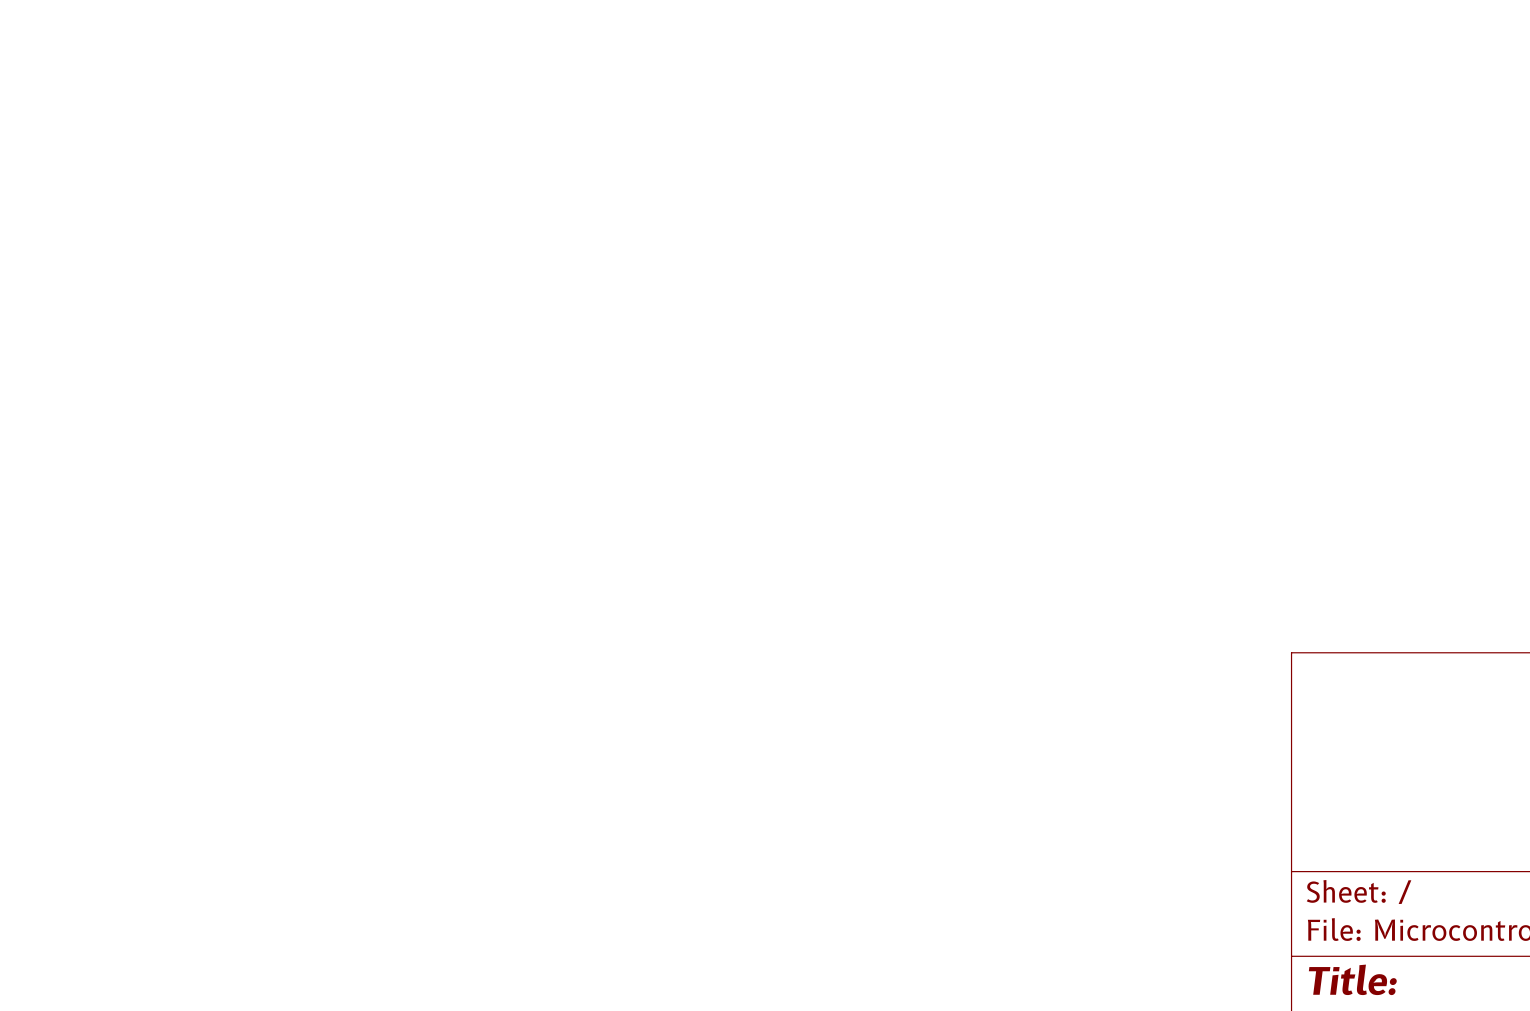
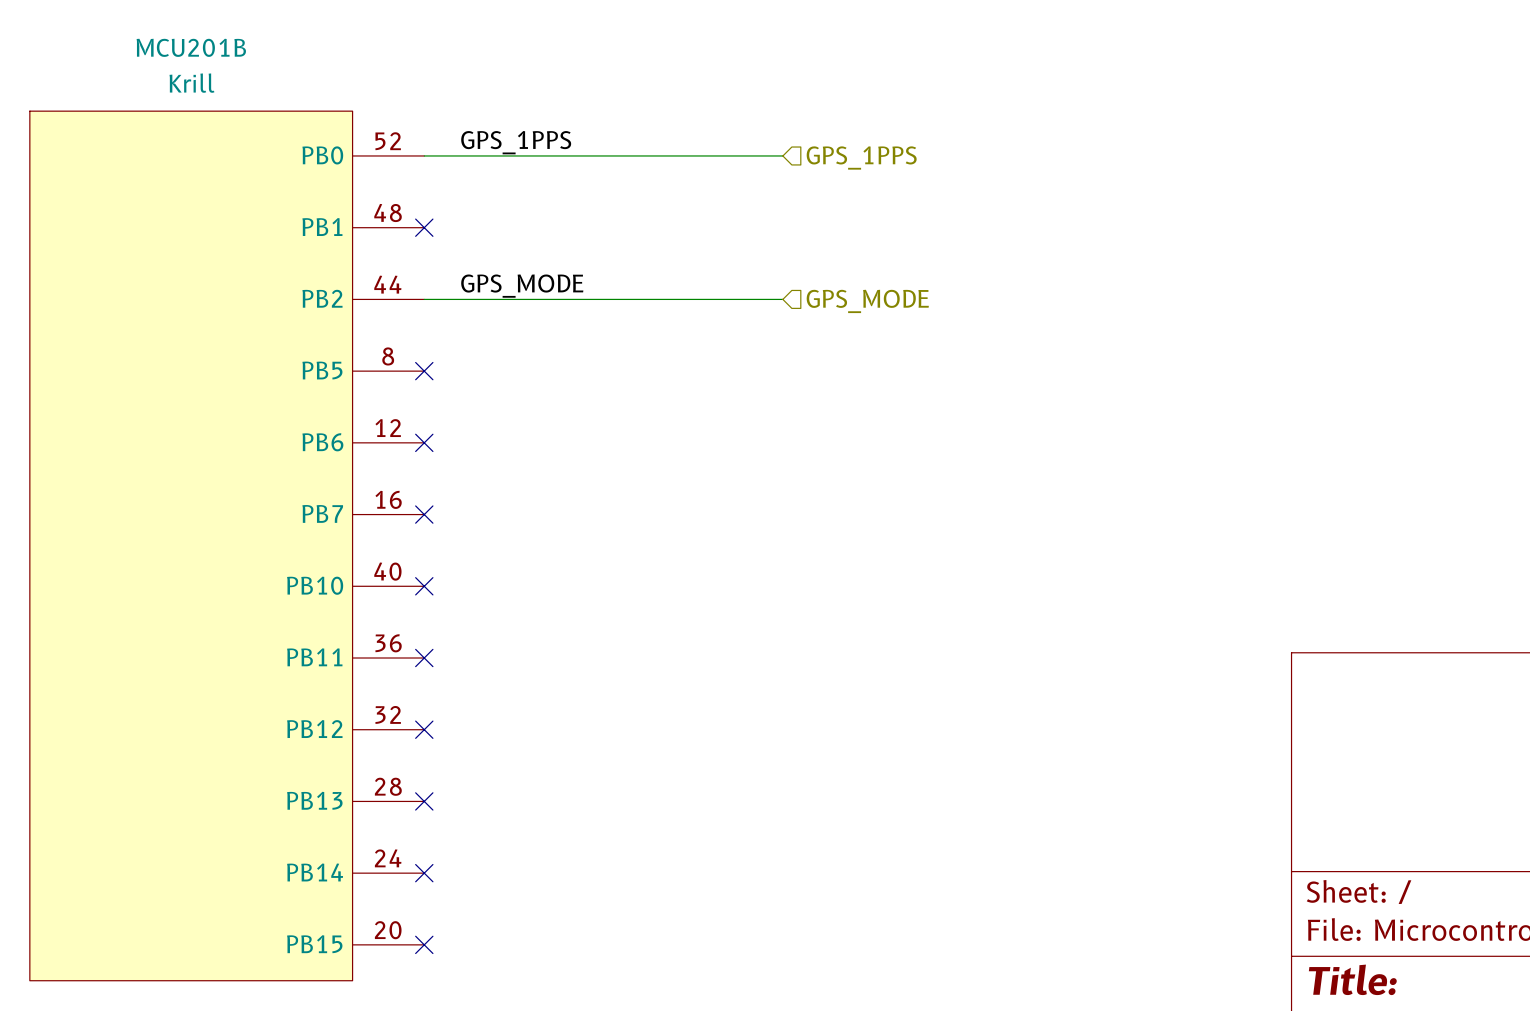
label: none -> GPS_1PPS (516, 142)
wire: none -> (424, 155) (782, 155)
hierarchical label: none -> GPS_1PPS (861, 157)
no-connect mark: none -> (424, 227)
label: none -> GPS_MODE (522, 286)
wire: none -> (424, 299) (782, 299)
hierarchical label: none -> GPS_MODE (867, 301)
no-connect mark: none -> (424, 371)
no-connect mark: none -> (424, 442)
no-connect mark: none -> (424, 514)
MCU201B: none -> Krill (227, 545)
no-connect mark: none -> (424, 586)
no-connect mark: none -> (424, 658)
no-connect mark: none -> (424, 729)
no-connect mark: none -> (424, 801)
no-connect mark: none -> (424, 873)
no-connect mark: none -> (424, 944)

